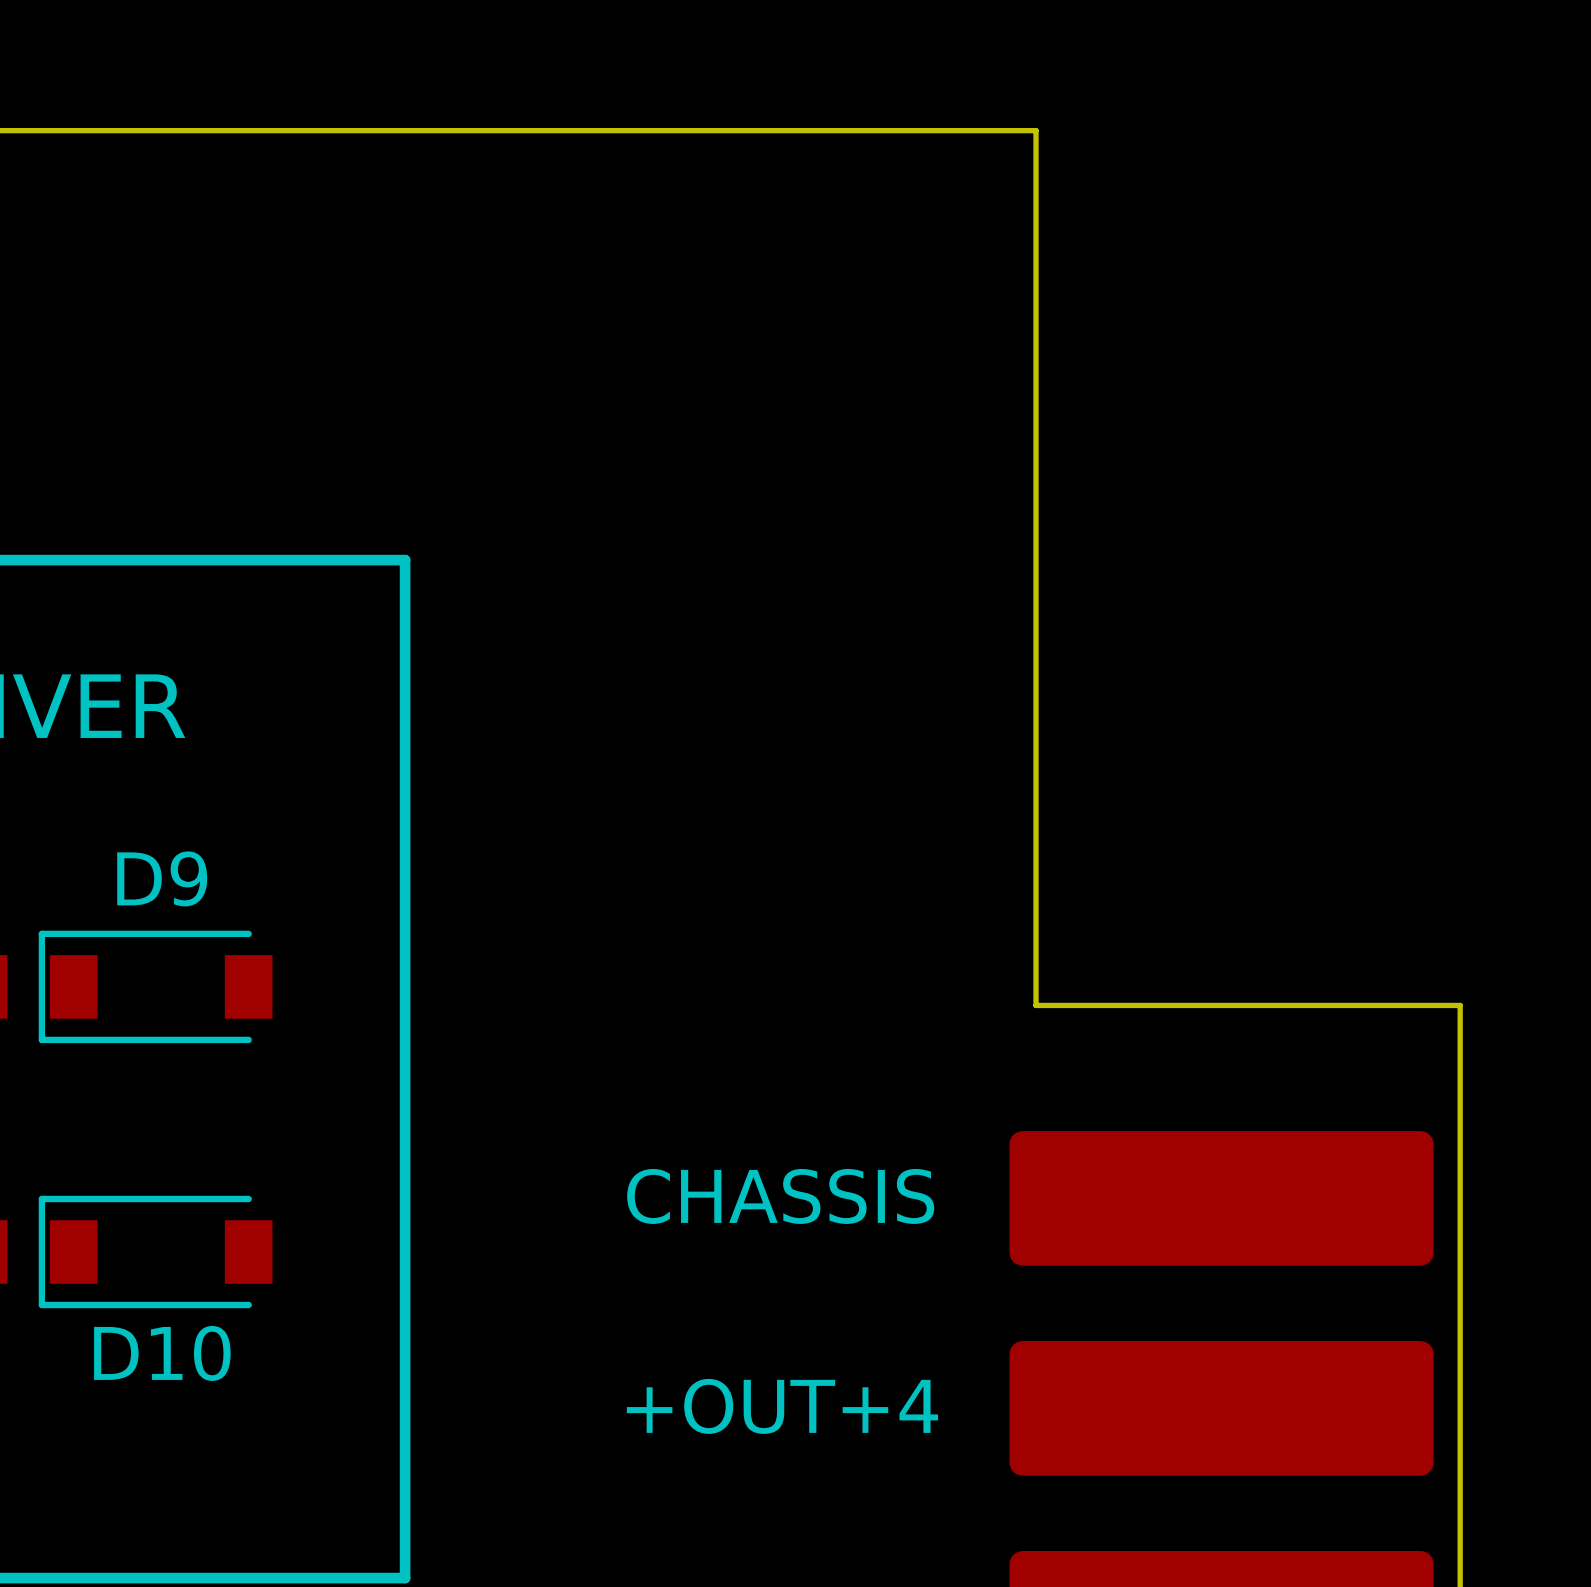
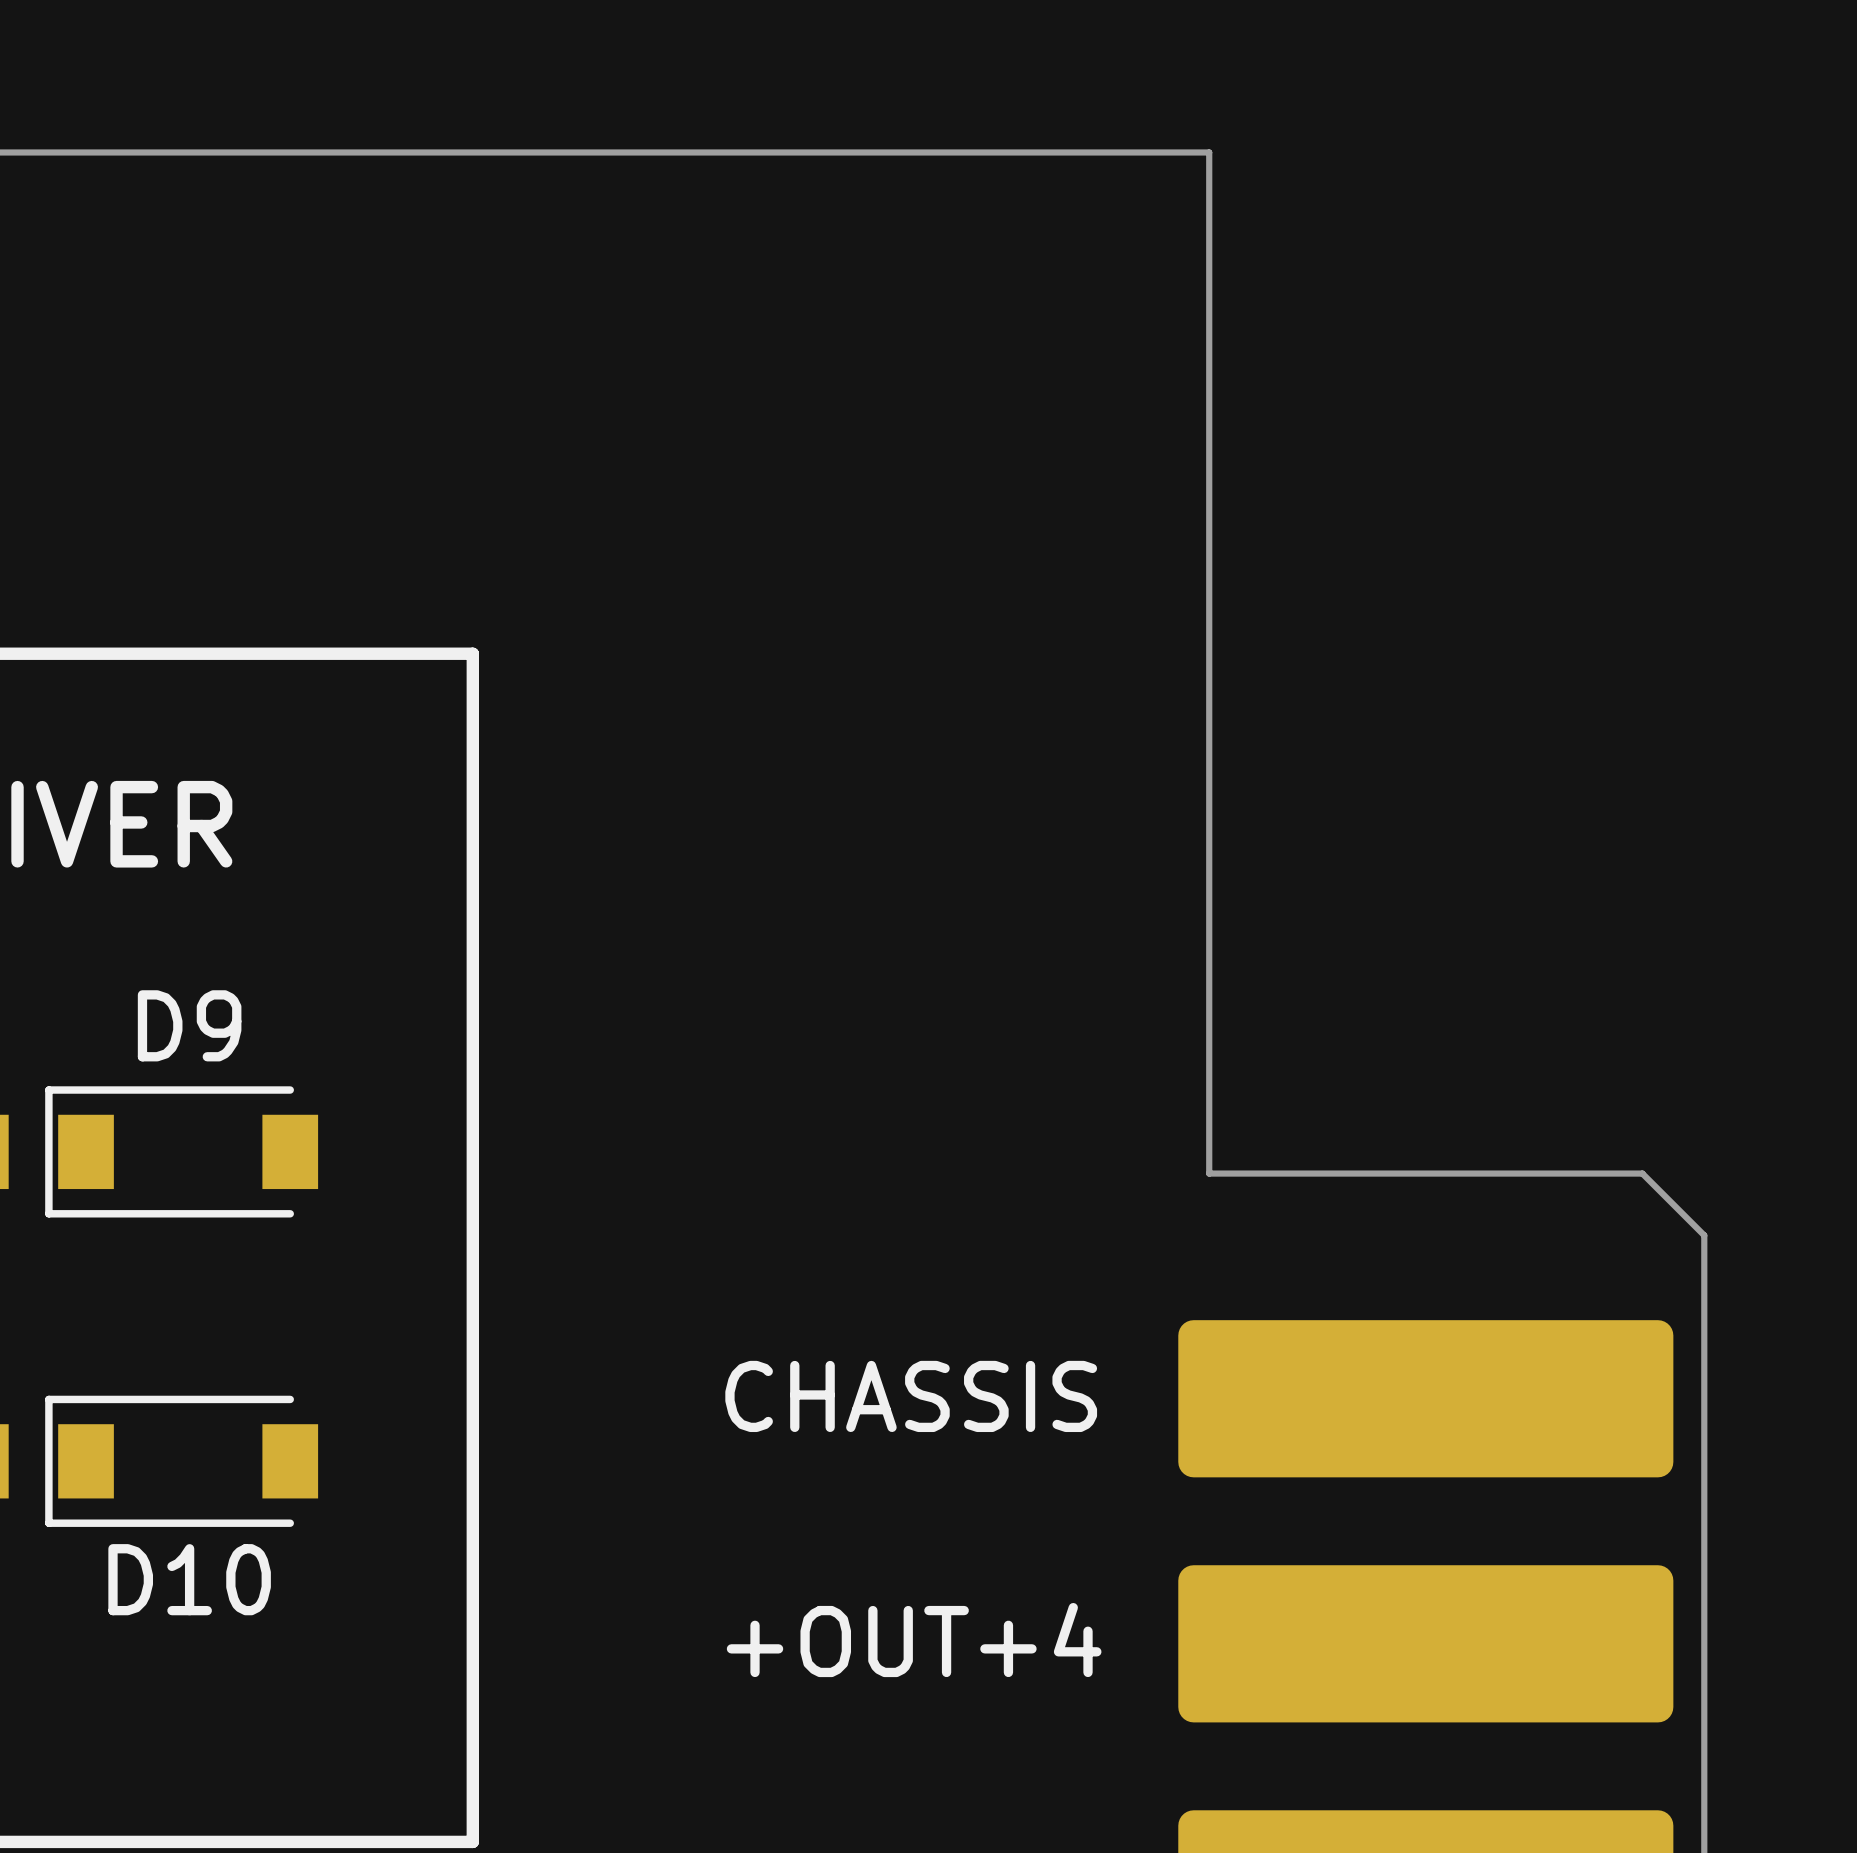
board edge: (1407, 1005) (1460, 1005) (1460, 1058) -> (1642, 1173) (1704, 1235)

